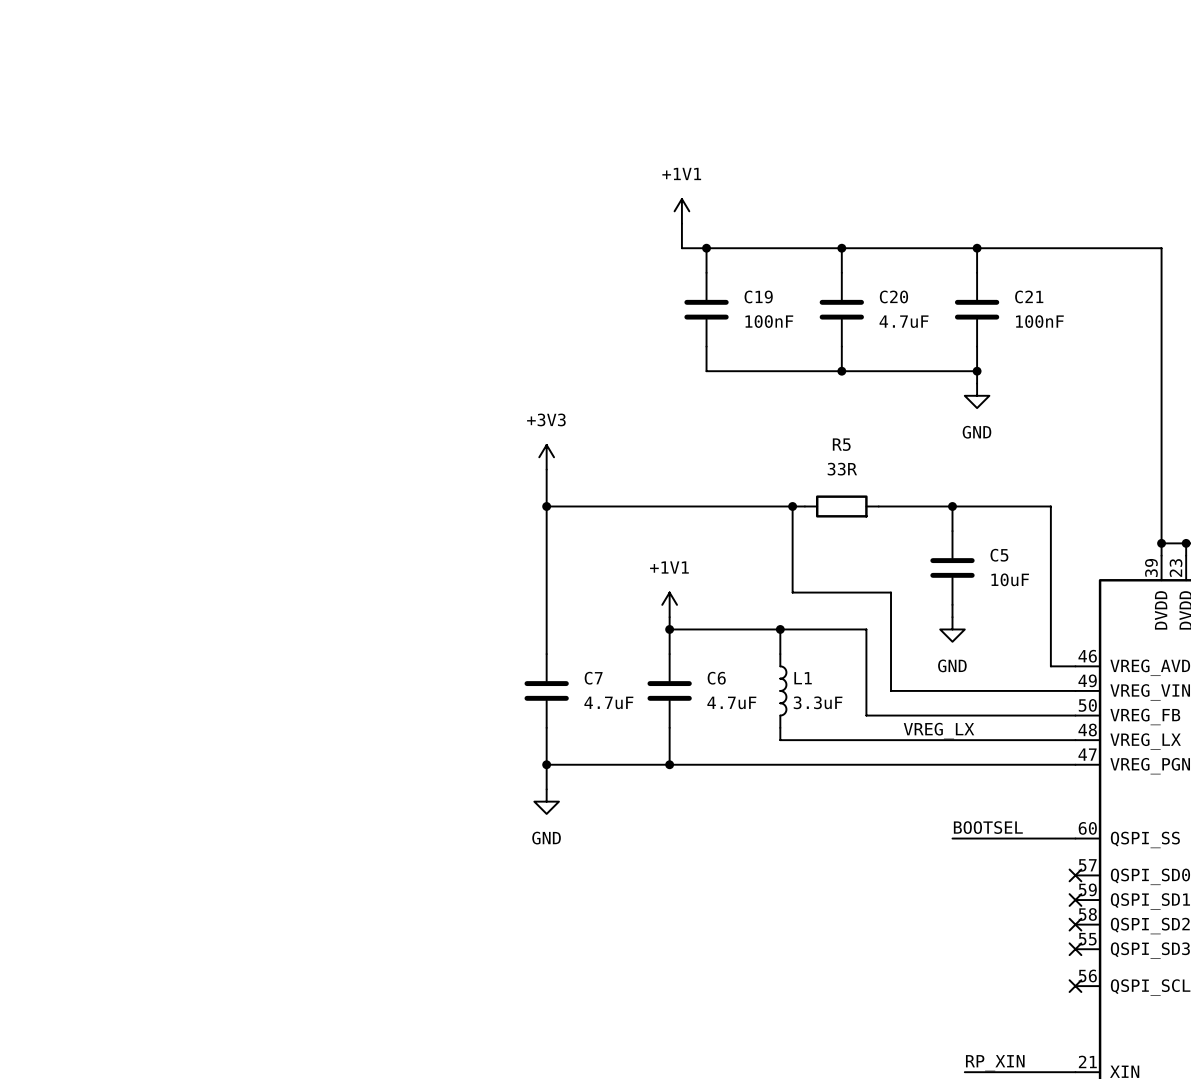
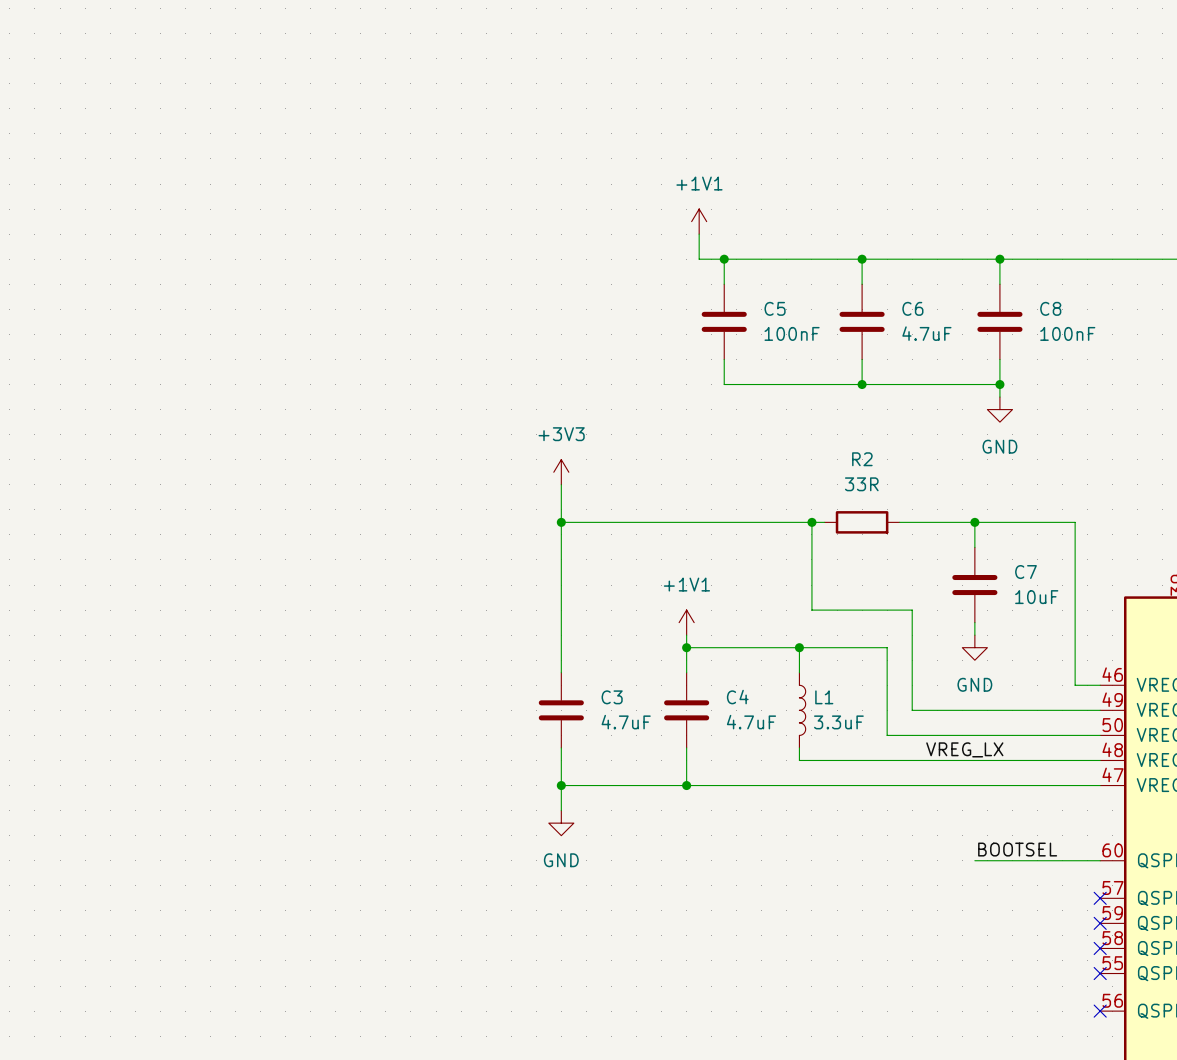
C19 name: C19 (758, 296) -> C5 (775, 308)
C20 name: C20 (893, 296) -> C6 (912, 308)
C21 name: C21 (1029, 296) -> C8 (1050, 308)
R5 name: R5 (841, 444) -> R2 (862, 459)
C5 name: C5 (999, 555) -> C7 (1025, 572)
C7 name: C7 (593, 678) -> C3 (612, 697)
C6 name: C6 (716, 678) -> C4 (737, 697)

